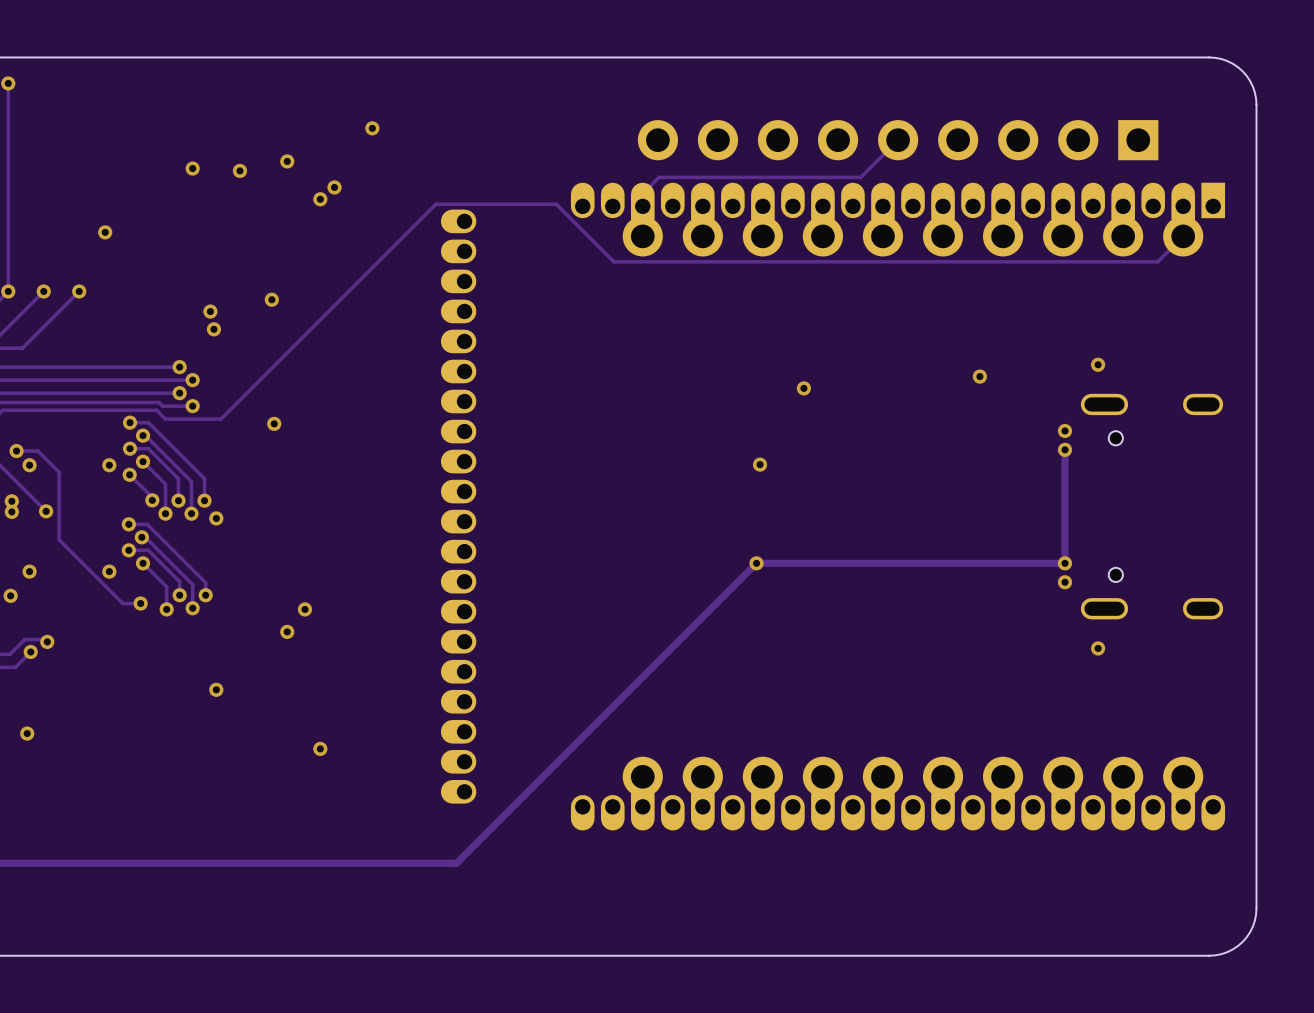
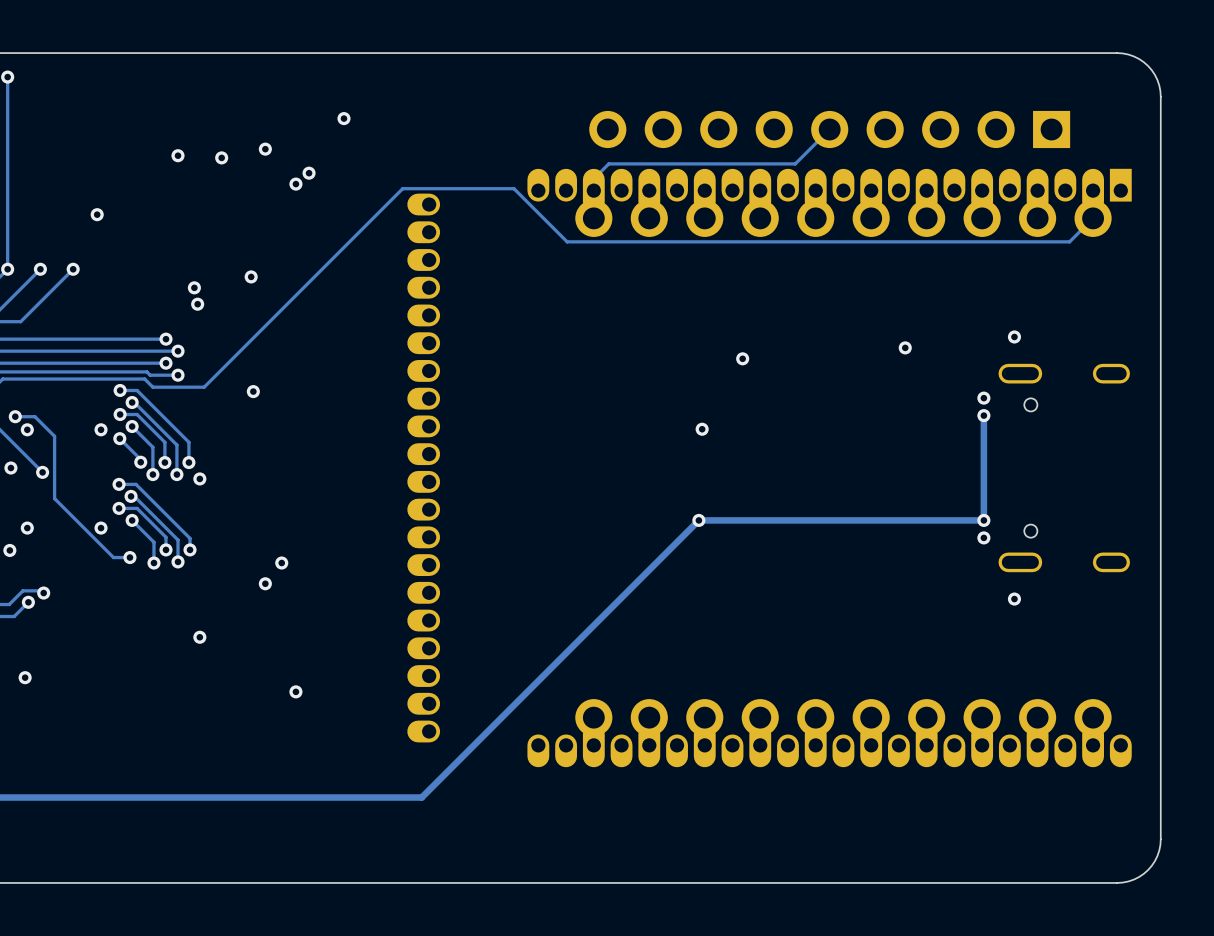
via: (11, 501) -> none
via: none -> (10, 468)
via: (11, 511) -> none

